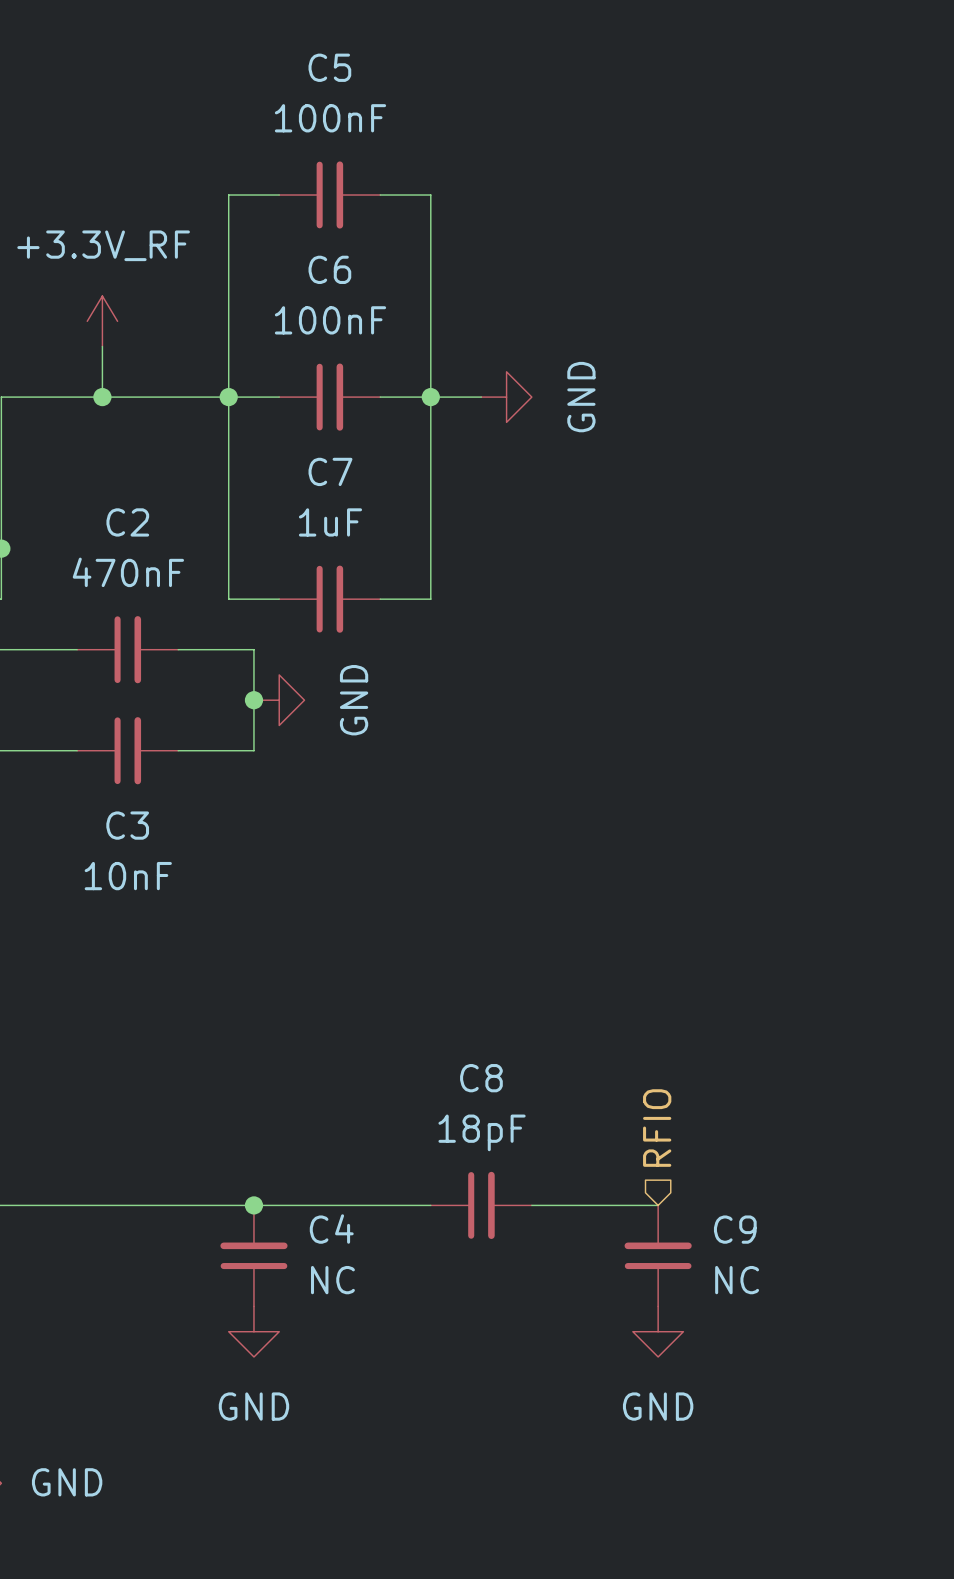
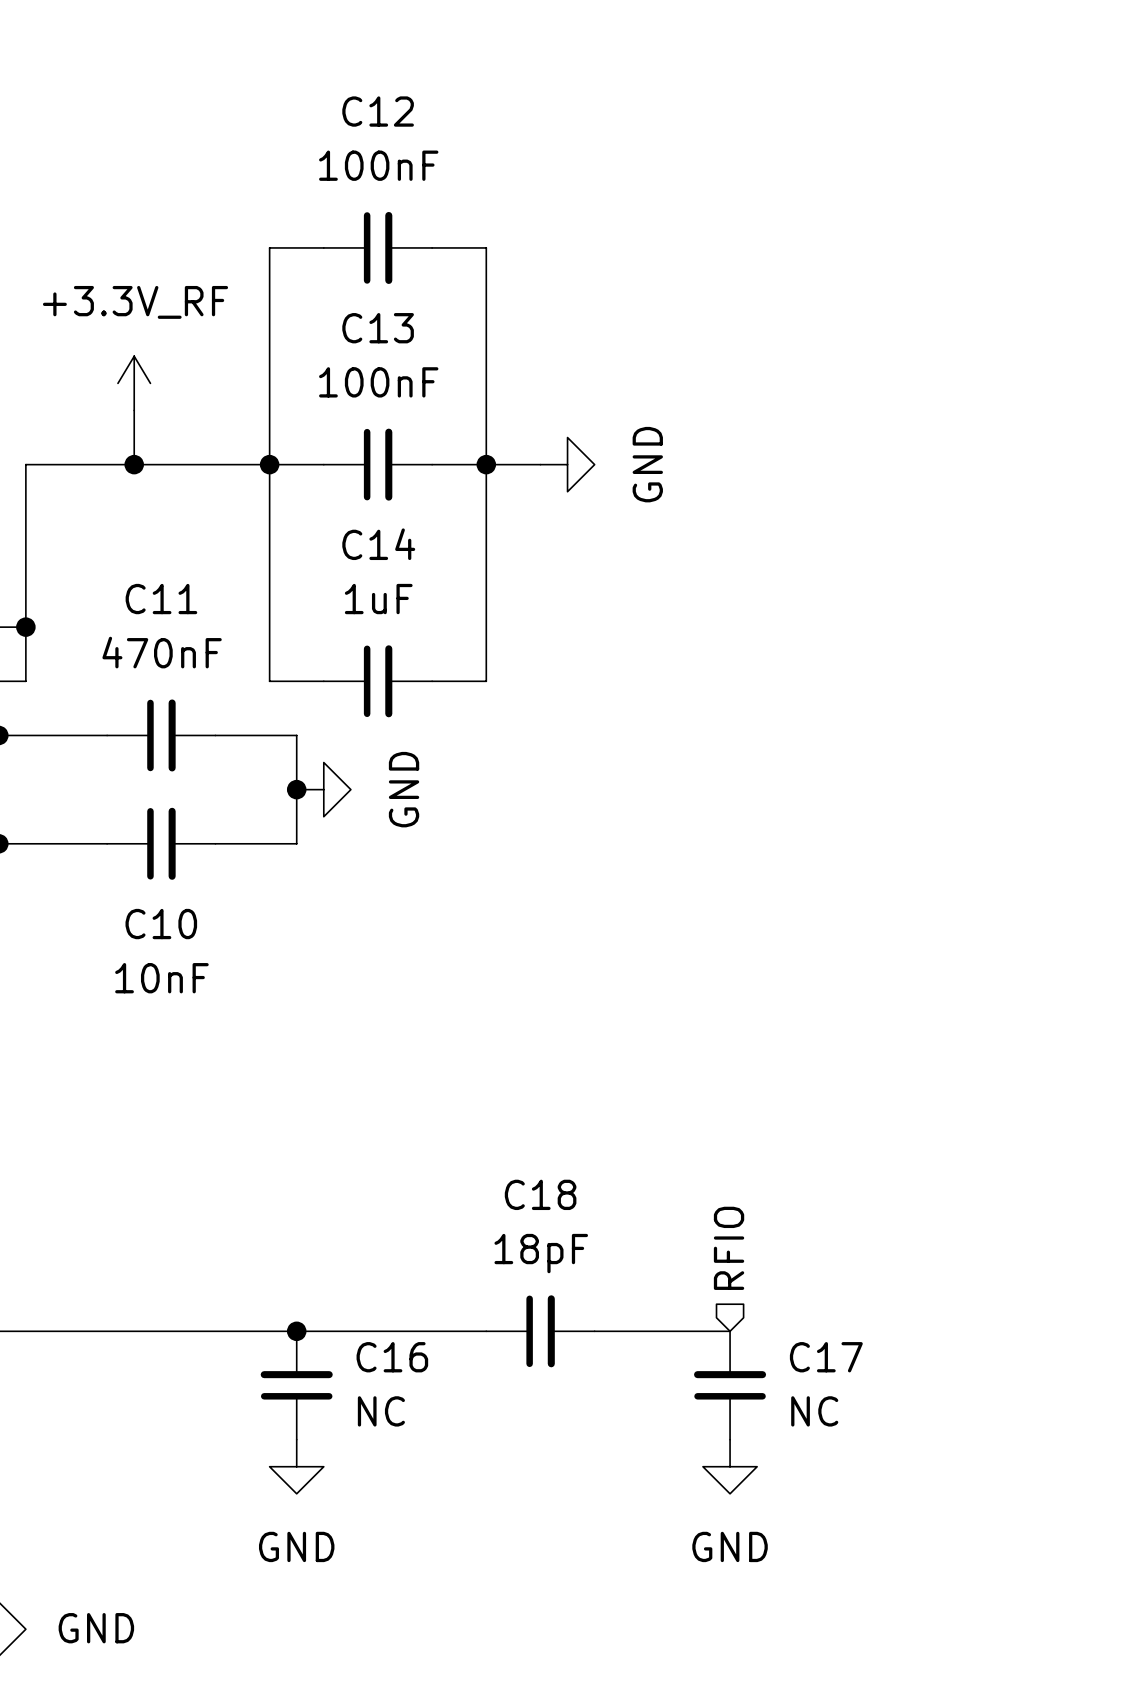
C5 name: C5 (329, 67) -> C12 (378, 111)
C6 name: C6 (329, 269) -> C13 (378, 328)
C7 name: C7 (330, 471) -> C14 (378, 544)
C2 name: C2 (127, 522) -> C11 (161, 599)
C3 name: C3 (127, 825) -> C10 (161, 924)
C8 name: C8 (481, 1078) -> C18 (540, 1194)
C4 name: C4 (331, 1229) -> C16 (392, 1357)
C9 name: C9 (735, 1229) -> C17 (826, 1357)

